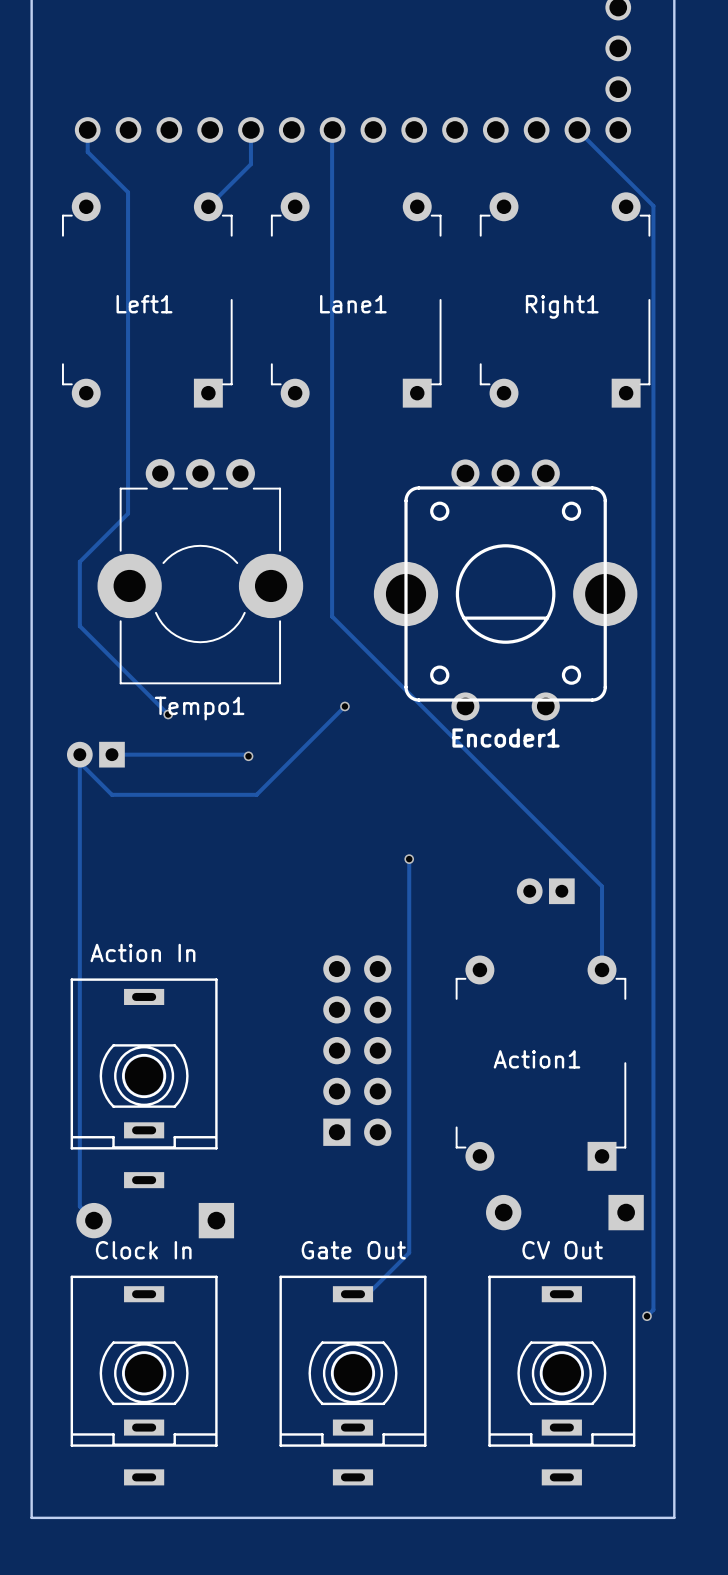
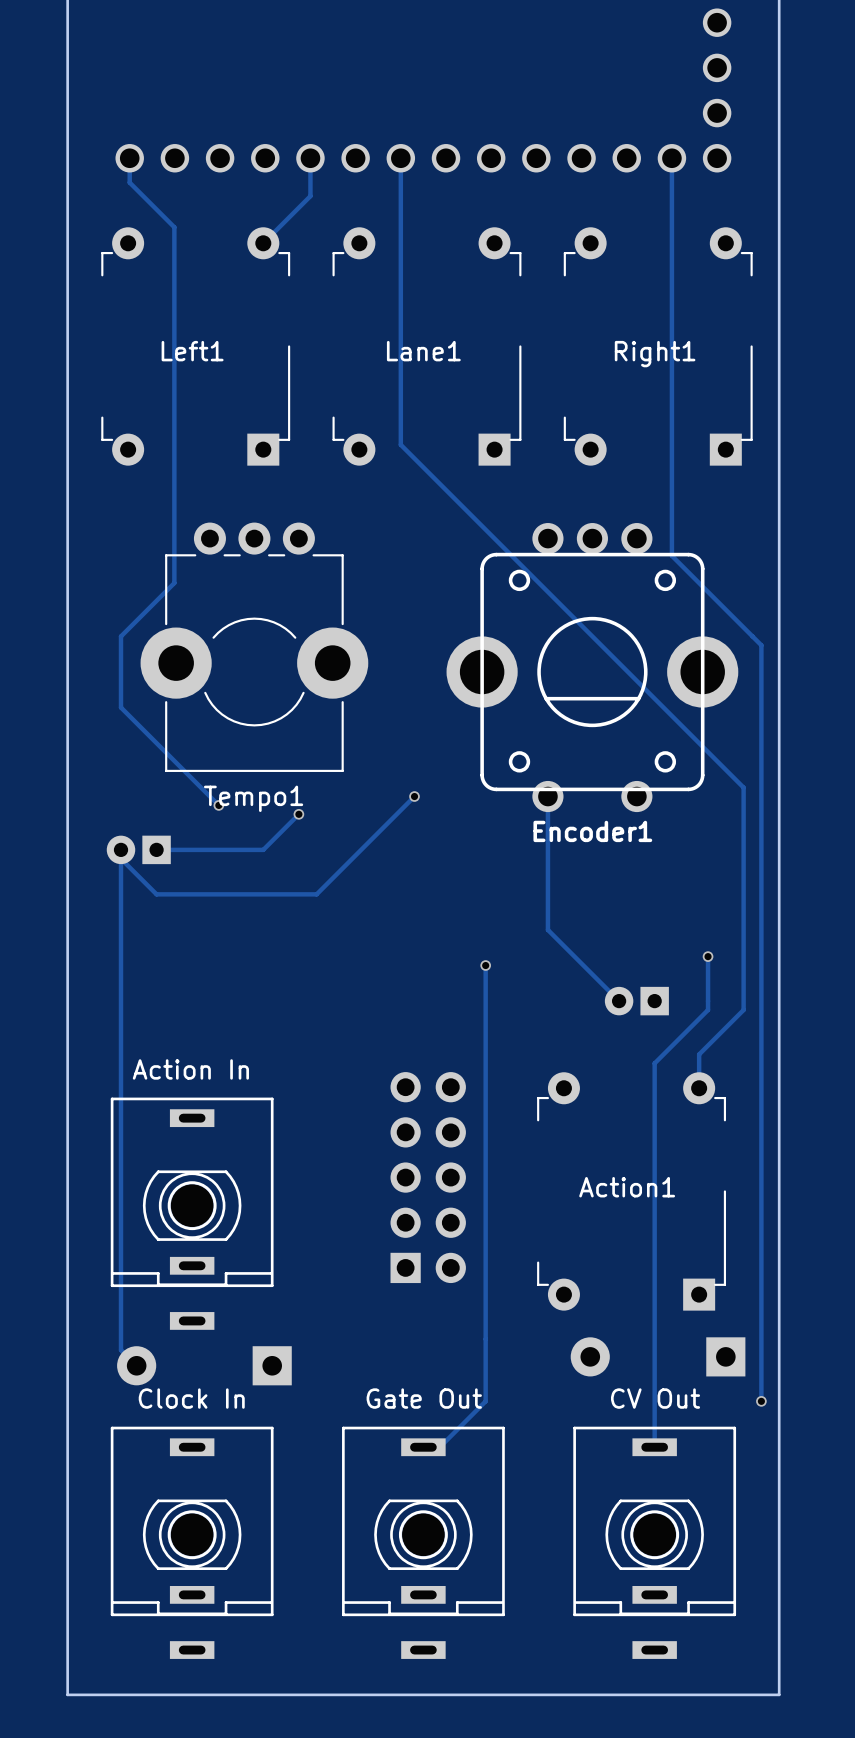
track: (332, 129) (332, 616) (602, 886) (602, 939) -> (400, 158) (400, 444) (743, 787) (743, 1009) (699, 1054)
track: (577, 129) (653, 205) (653, 1309) (647, 1316) -> (671, 158) (671, 555) (761, 645) (761, 1401)
track: none -> (547, 796) (547, 929) (619, 1001)
track: (208, 754) (246, 754) (248, 756) -> (263, 849) (298, 814)
via position: (248, 756) -> (298, 814)
track: none -> (708, 956) (708, 1009) (654, 1063) (654, 1447)
via: none -> (708, 956)
via position: (647, 1316) -> (761, 1401)

